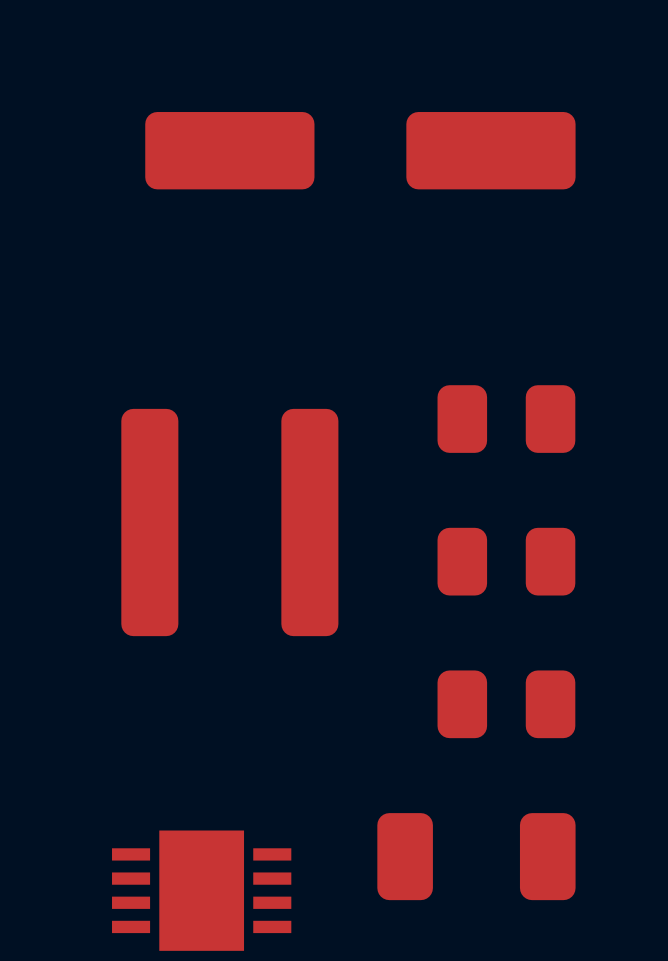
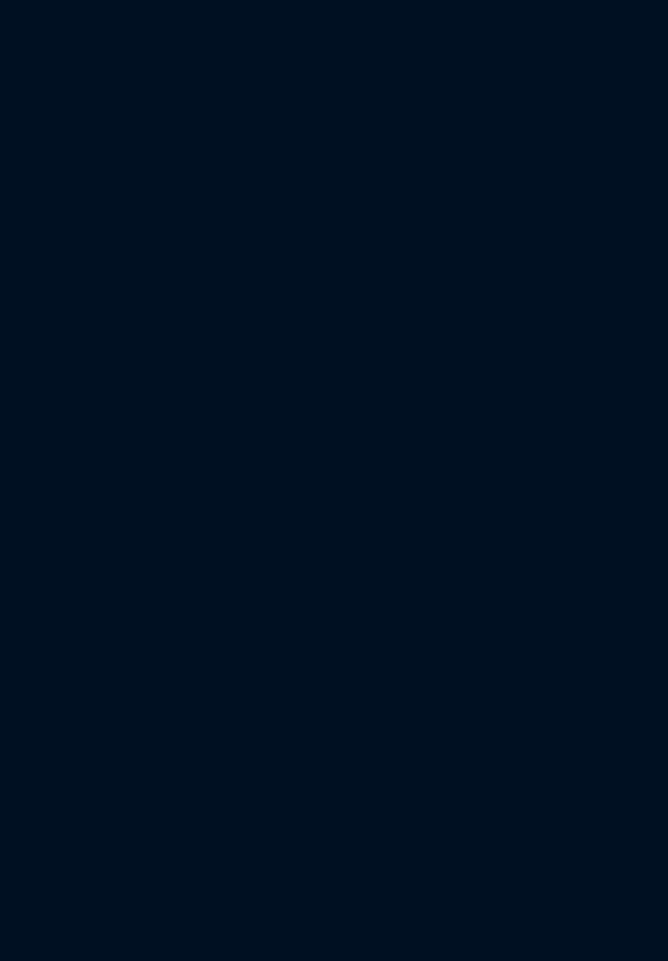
part: (360, 150) -> none
part: (506, 419) -> none
part: (229, 522) -> none
part: (506, 561) -> none
part: (506, 704) -> none
part: (476, 856) -> none
part: (201, 890) -> none

